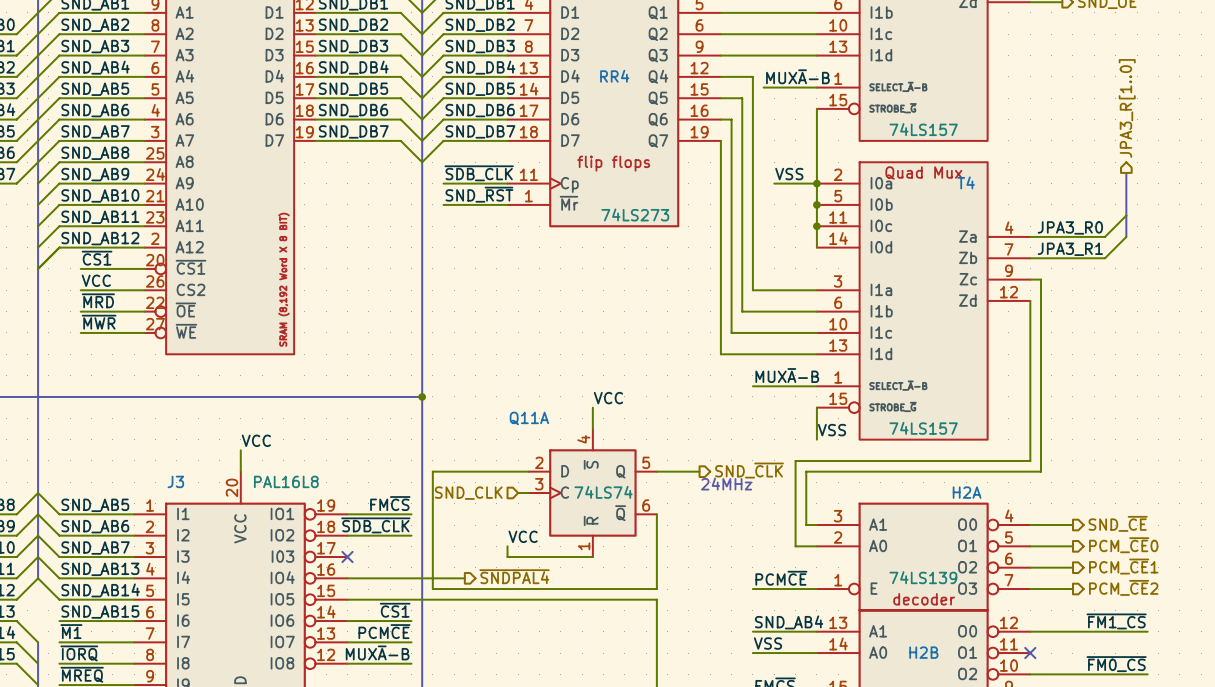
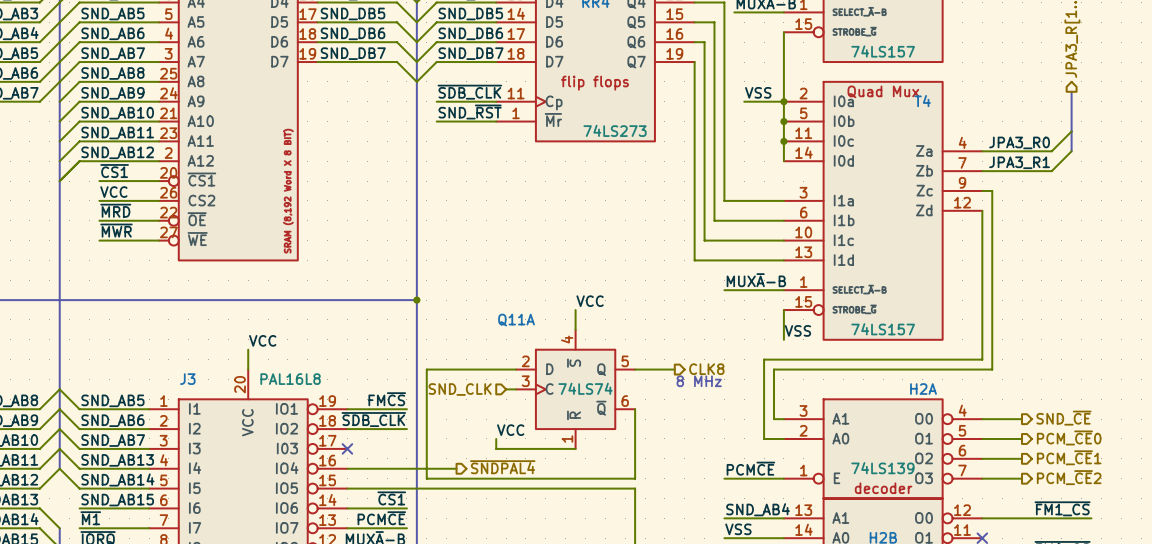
hierarchical label: SND_~{CLK} (749, 470) -> CLK8 (706, 369)
text: 24MHz (726, 484) -> 8 MHz (699, 381)

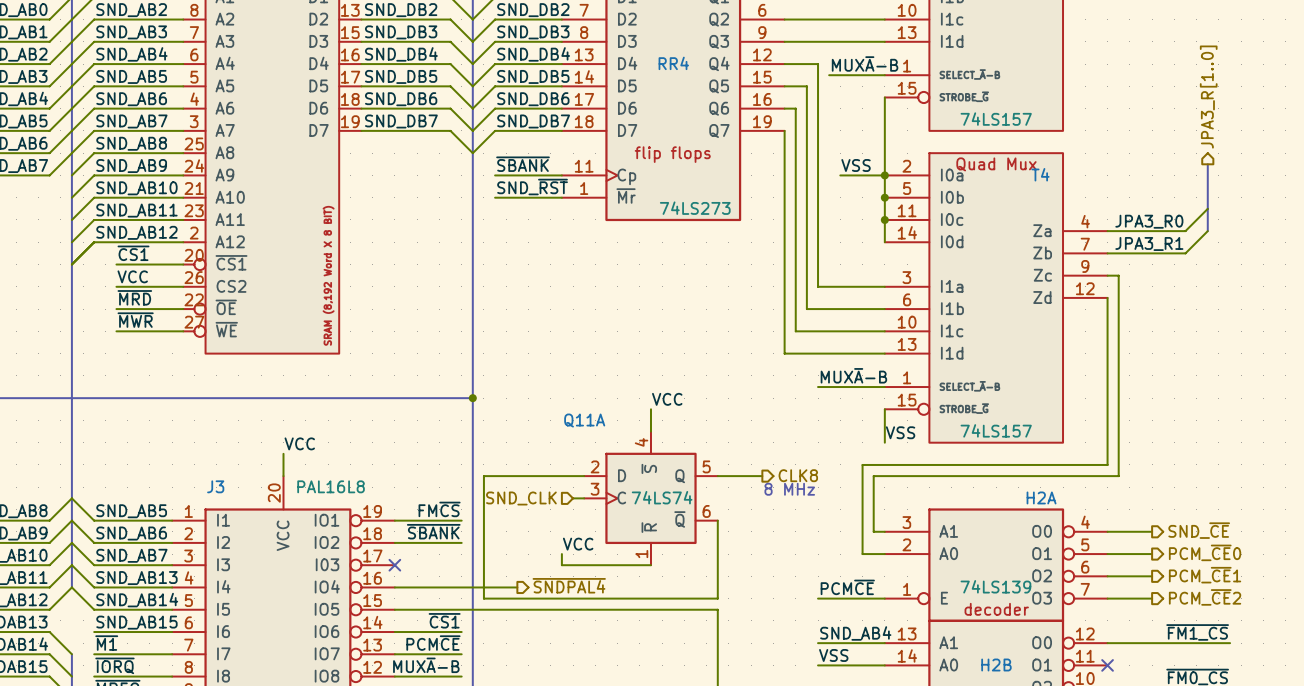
label: ~{SDB_CLK} (469, 92) -> ~{SBANK} (523, 164)
label: ~{SDB_CLK} (373, 419) -> ~{SBANK} (433, 531)

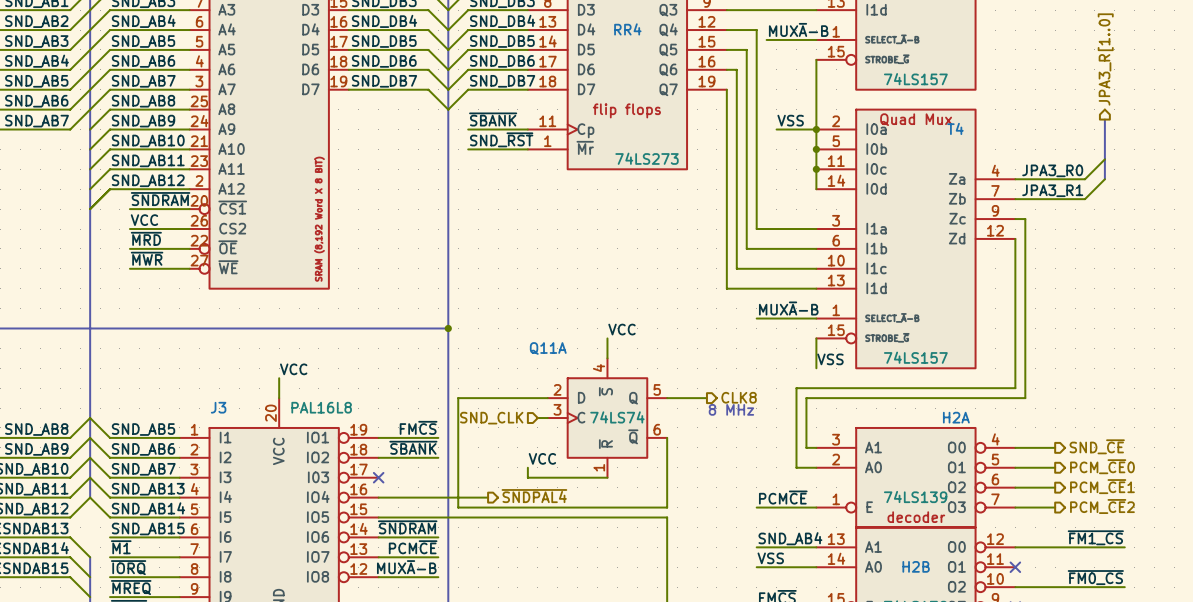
label: ~{CS1} (133, 253) -> ~{SNDRAM} (160, 199)
label: ~{CS1} (444, 620) -> ~{SNDRAM} (407, 527)

